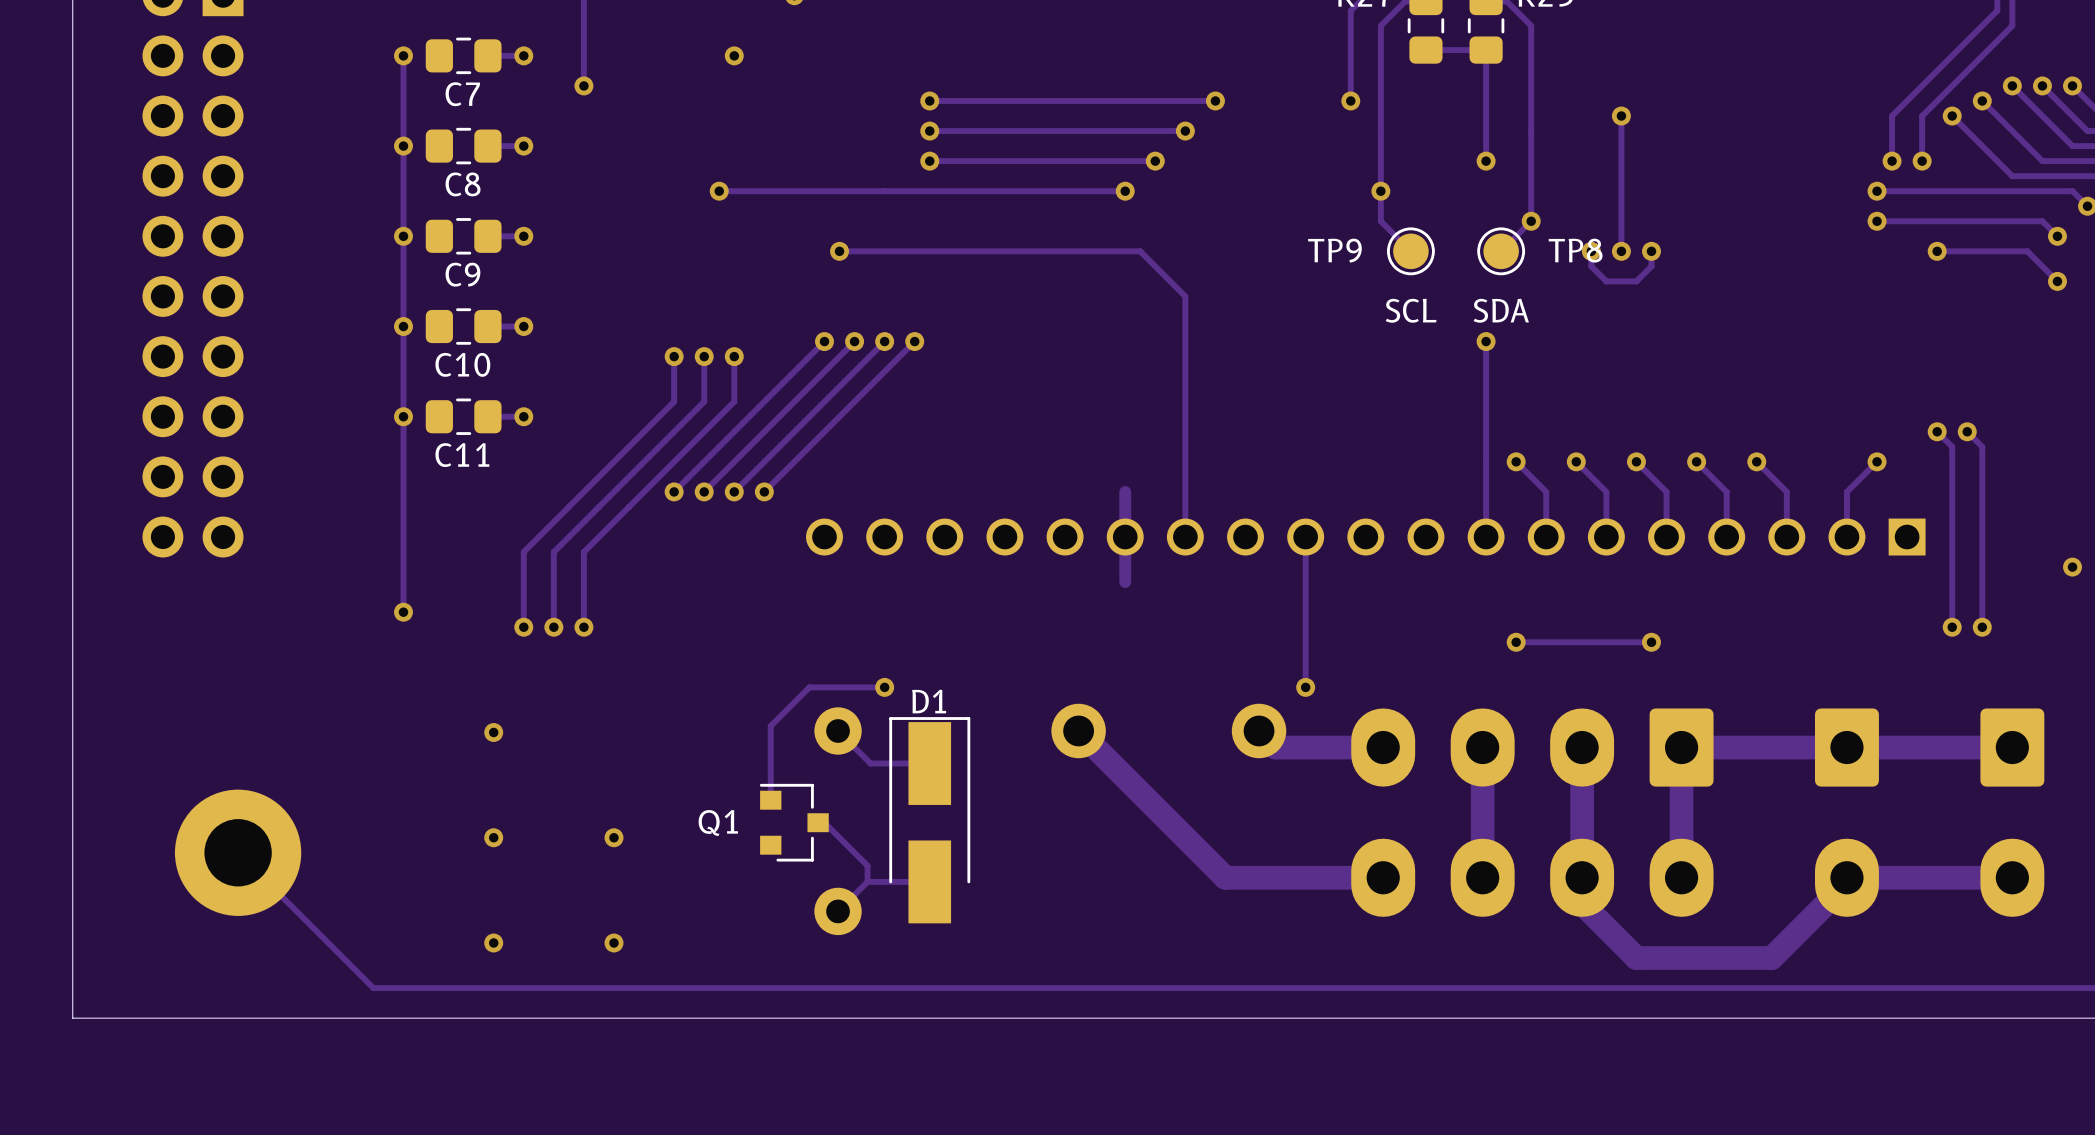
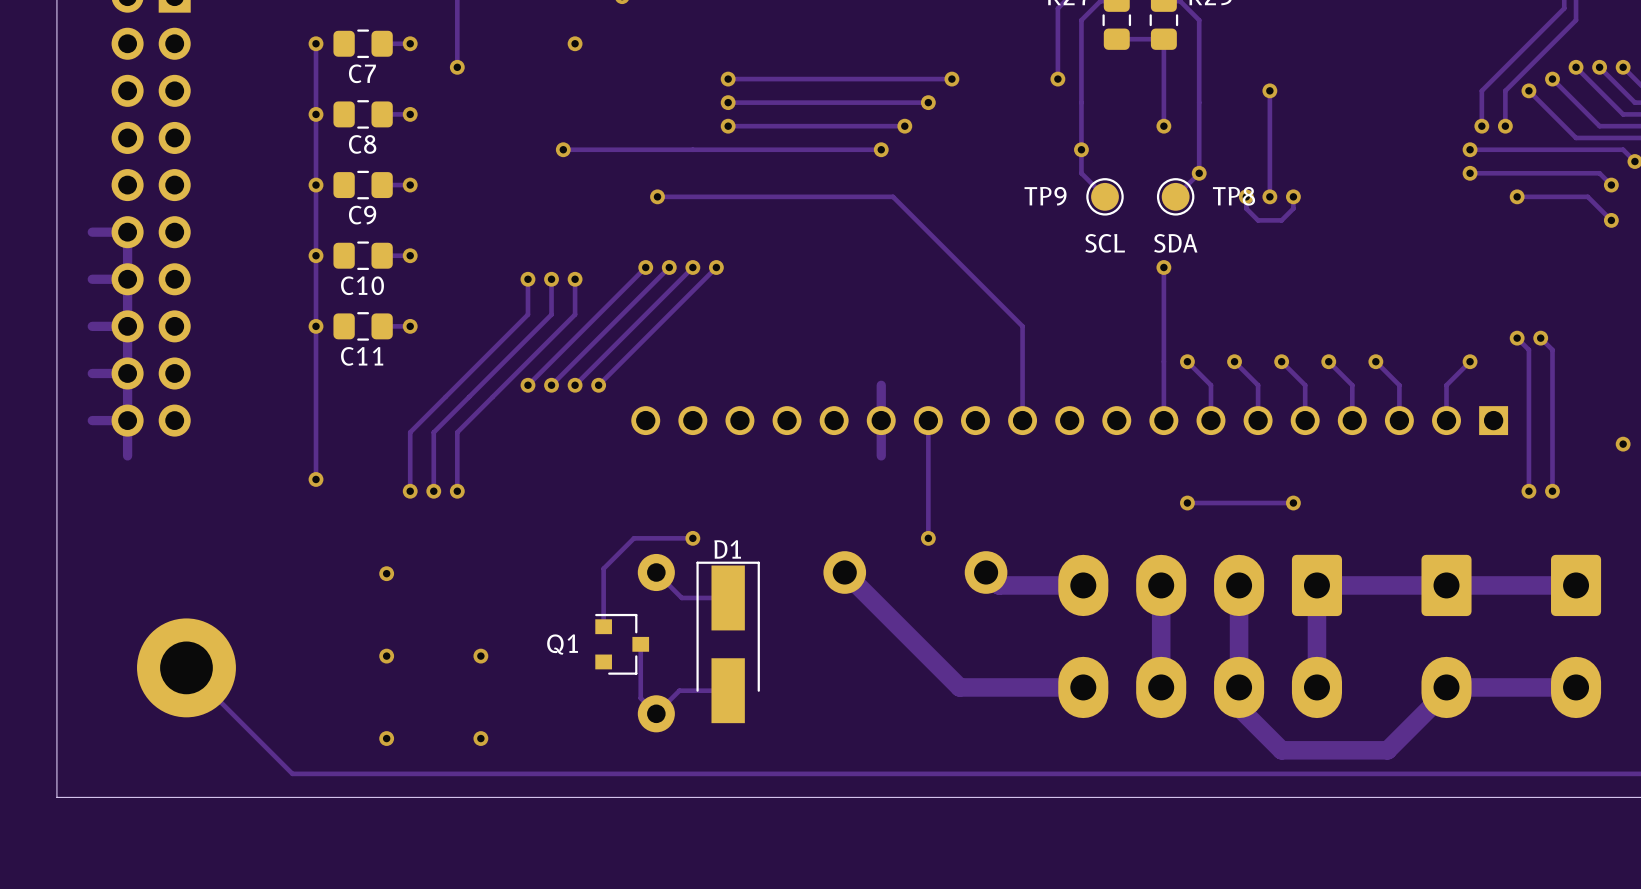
track: none -> (92, 232) (127, 232) (127, 455)
track: (1185, 296) (1185, 537) -> (928, 232) (1022, 326) (1022, 420)
track: none -> (127, 279) (92, 279)
track: none -> (127, 326) (92, 326)
track: none -> (127, 373) (92, 373)
track: none -> (127, 420) (92, 420)
track: (1305, 537) (1305, 687) -> (928, 420) (928, 538)
via position: (1305, 687) -> (928, 538)
track: (818, 822) (824, 822) (867, 865) (867, 881) -> (640, 644) (640, 698) (656, 713)

